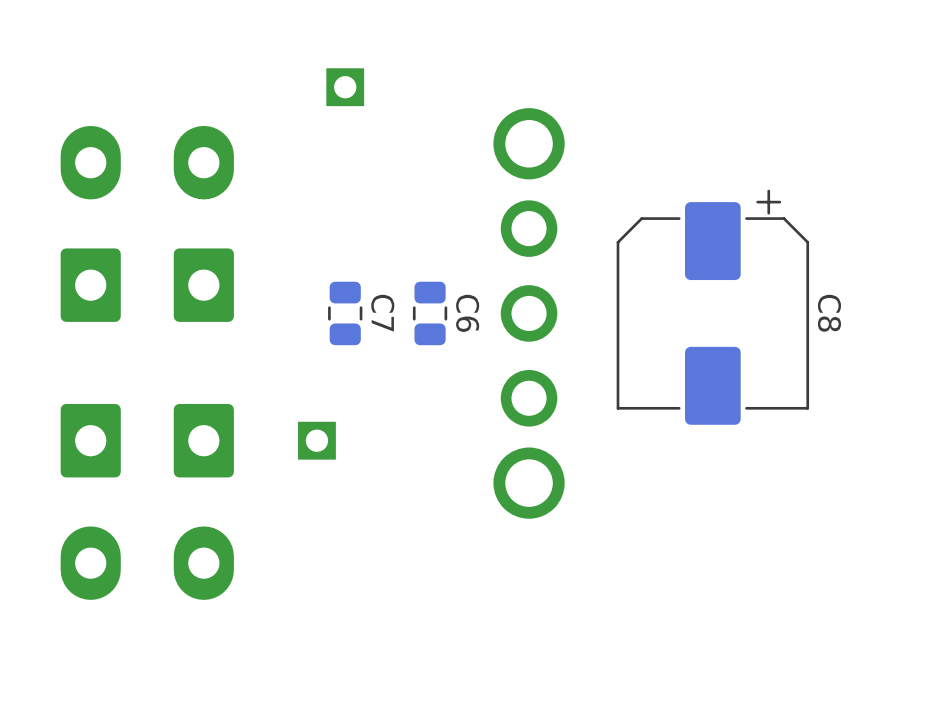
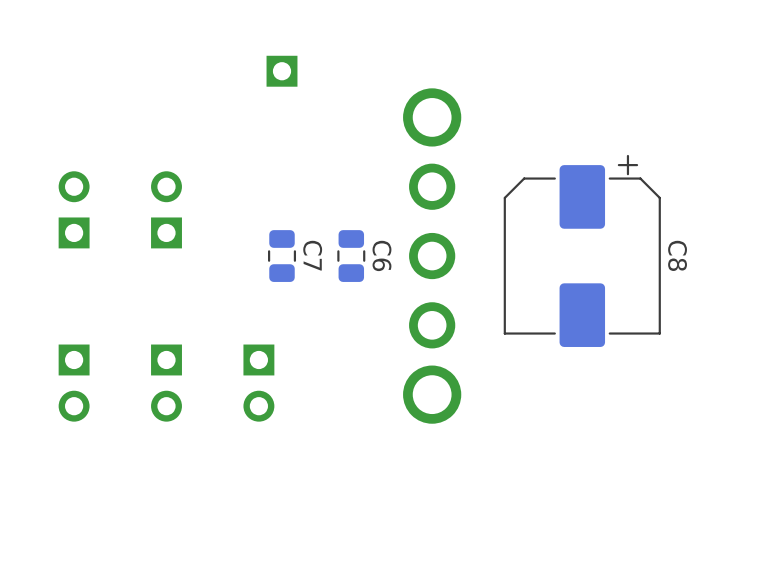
part: (90, 223) -> none
part: (203, 223) -> none
part: none -> (74, 209)
part: none -> (166, 209)
part: none -> (74, 383)
part: none -> (166, 383)
part: none -> (258, 383)
part: (90, 501) -> none
part: (203, 501) -> none

